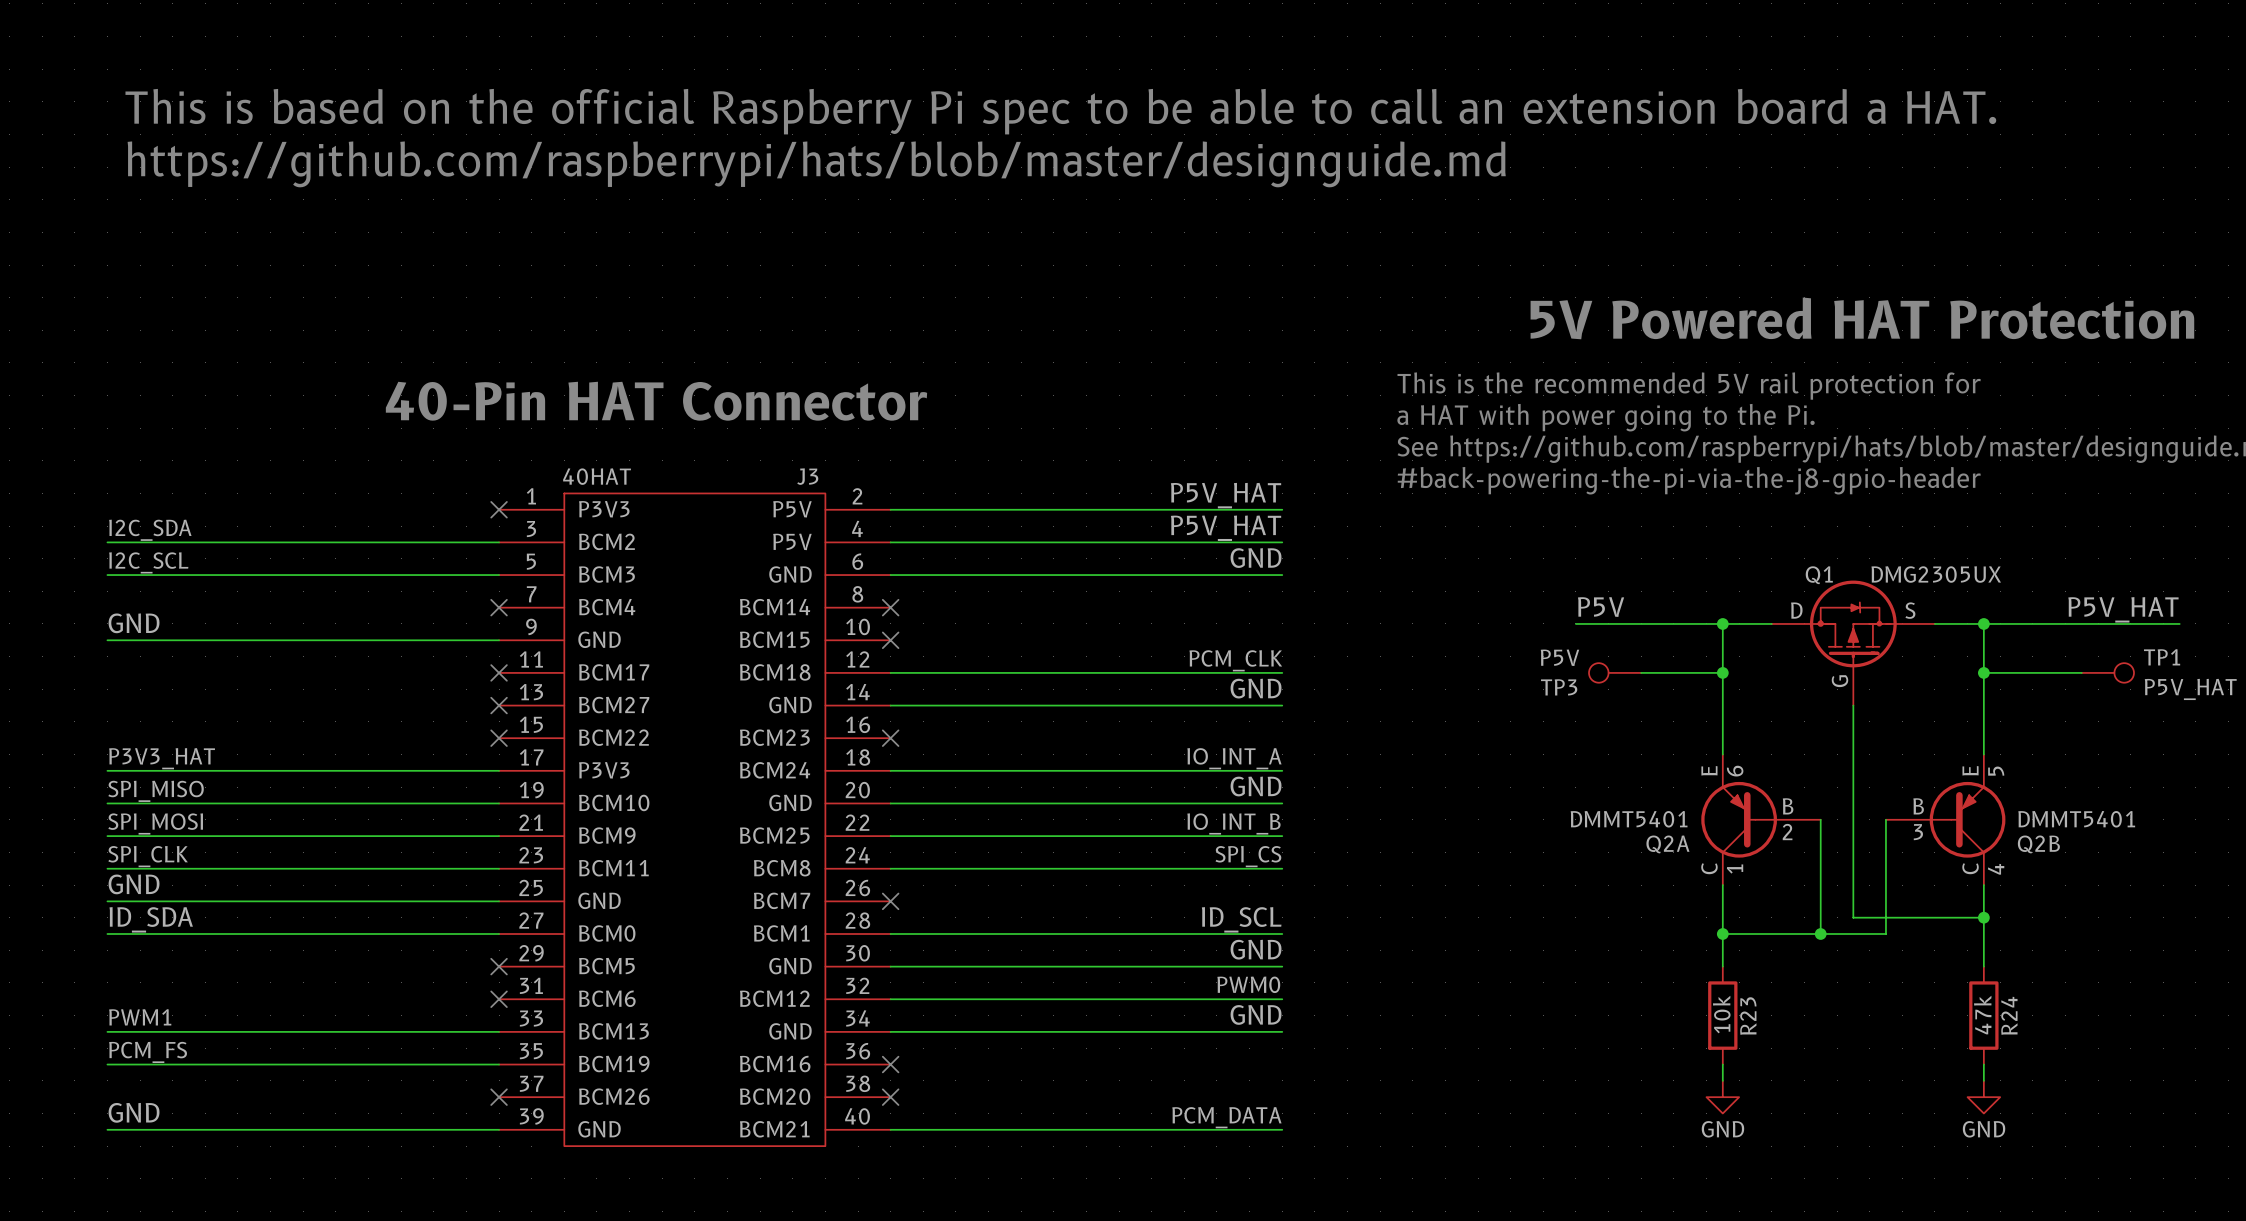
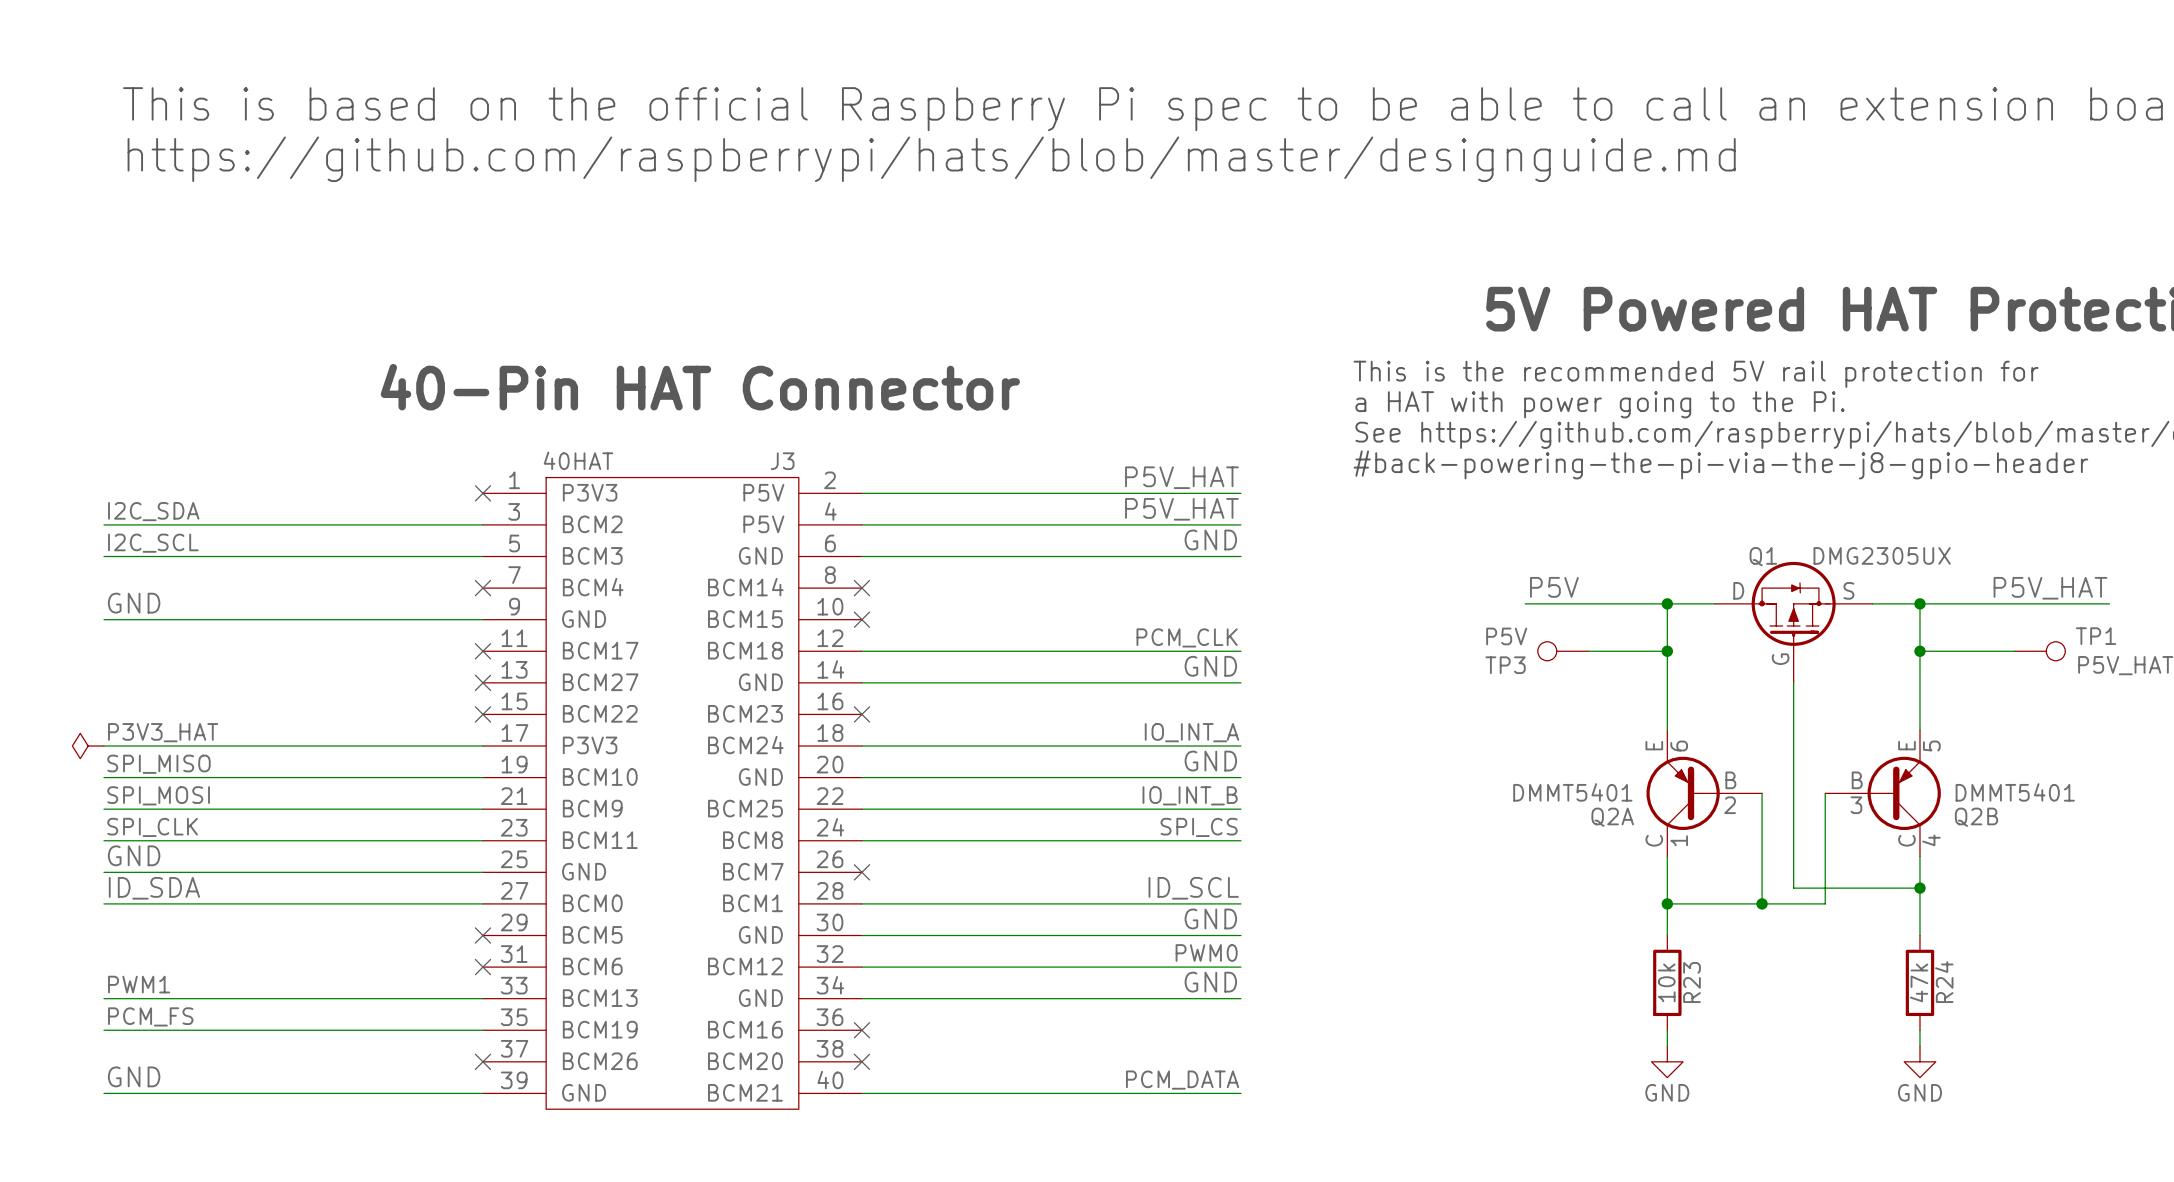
power symbol: none -> (88, 746)

